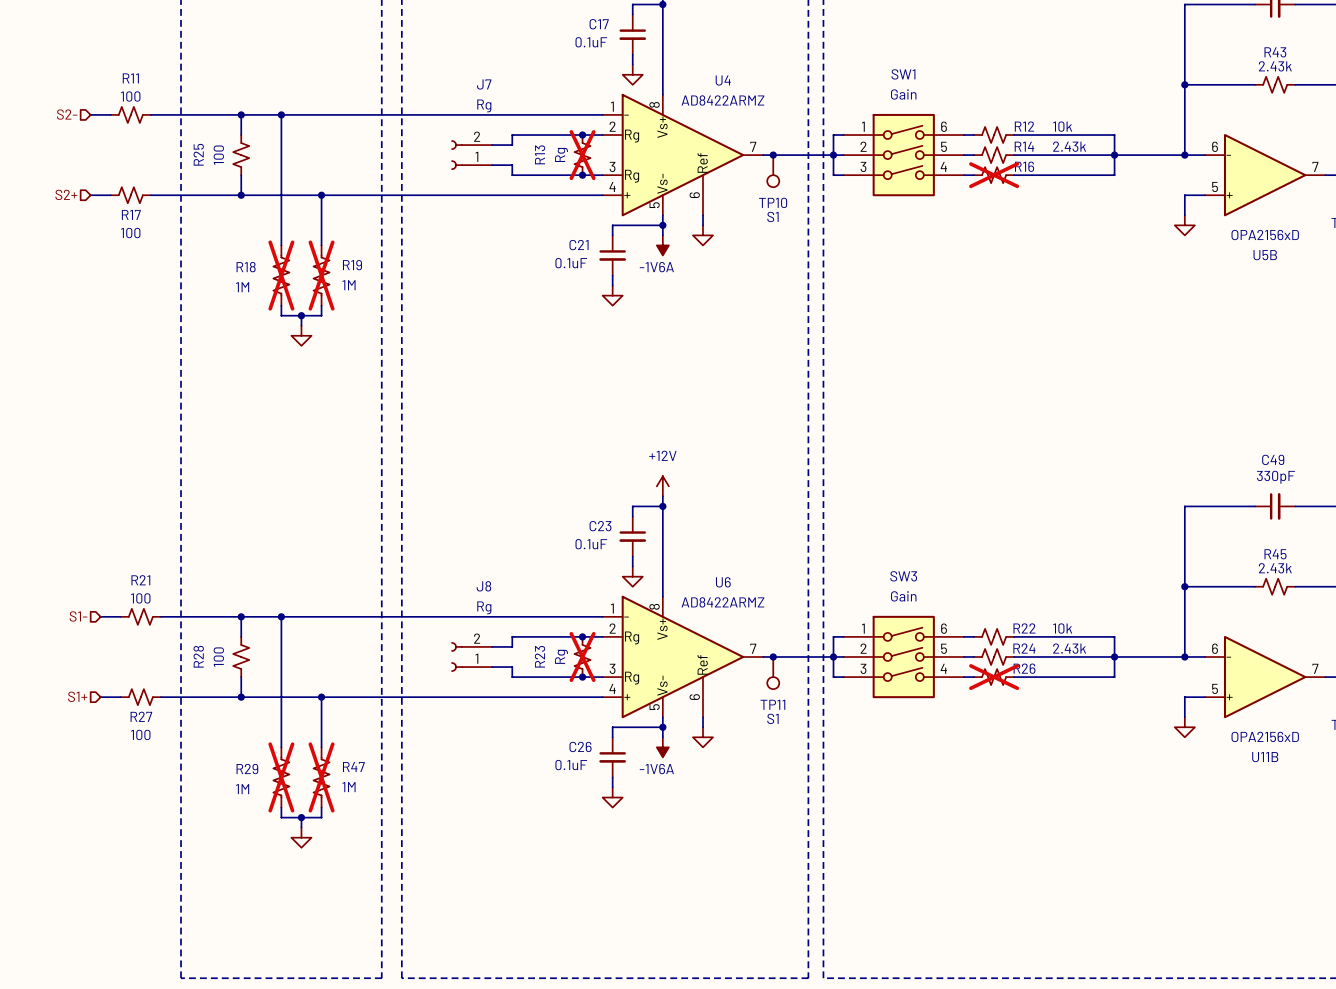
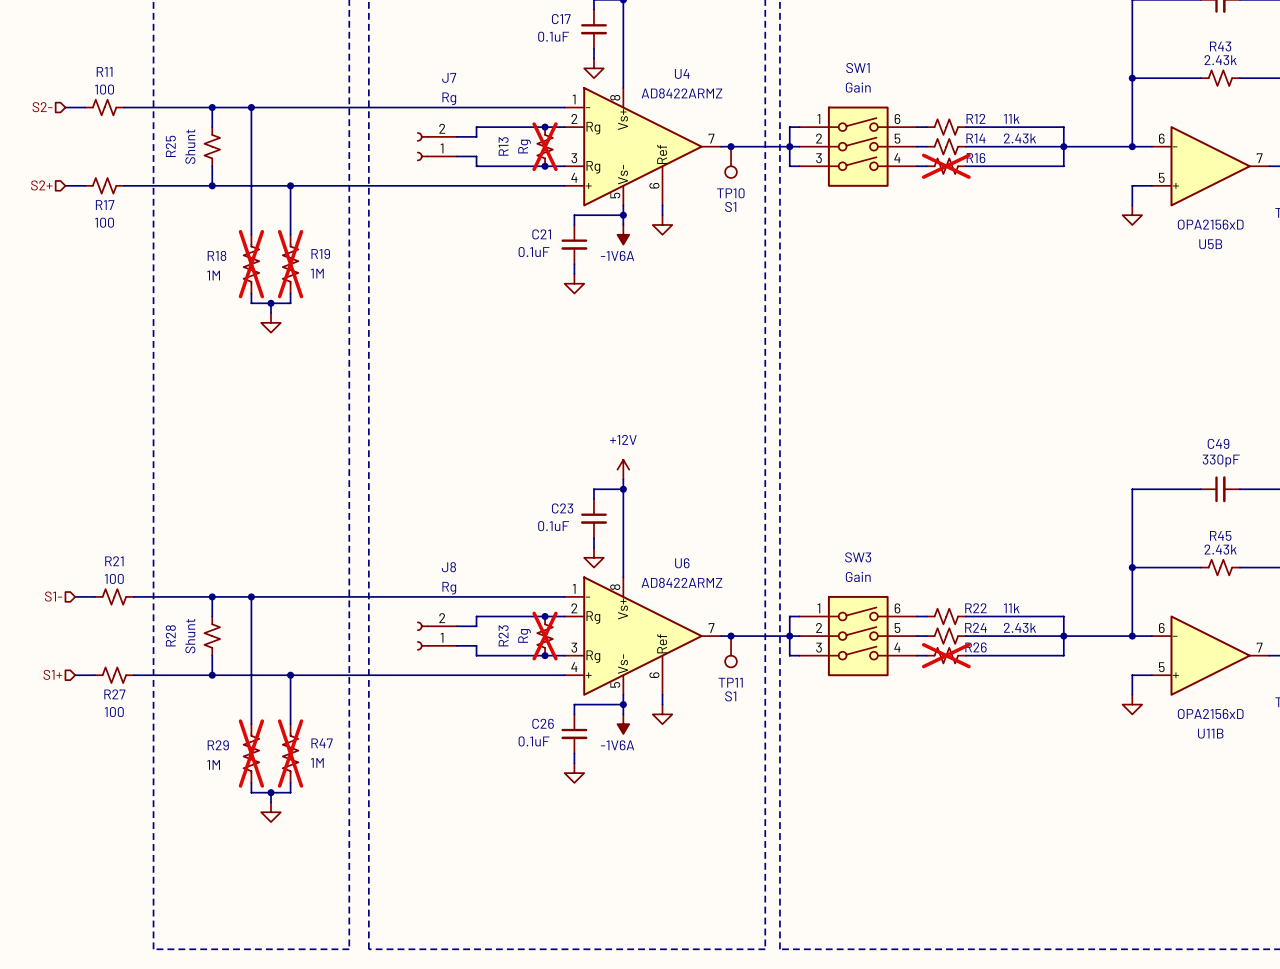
R12 value: 10k (1062, 126) -> 11k (1011, 118)
R25 value: 100 (218, 155) -> Shunt (190, 146)
R22 value: 10k (1062, 628) -> 11k (1011, 608)
R28 value: 100 (218, 657) -> Shunt (190, 636)

